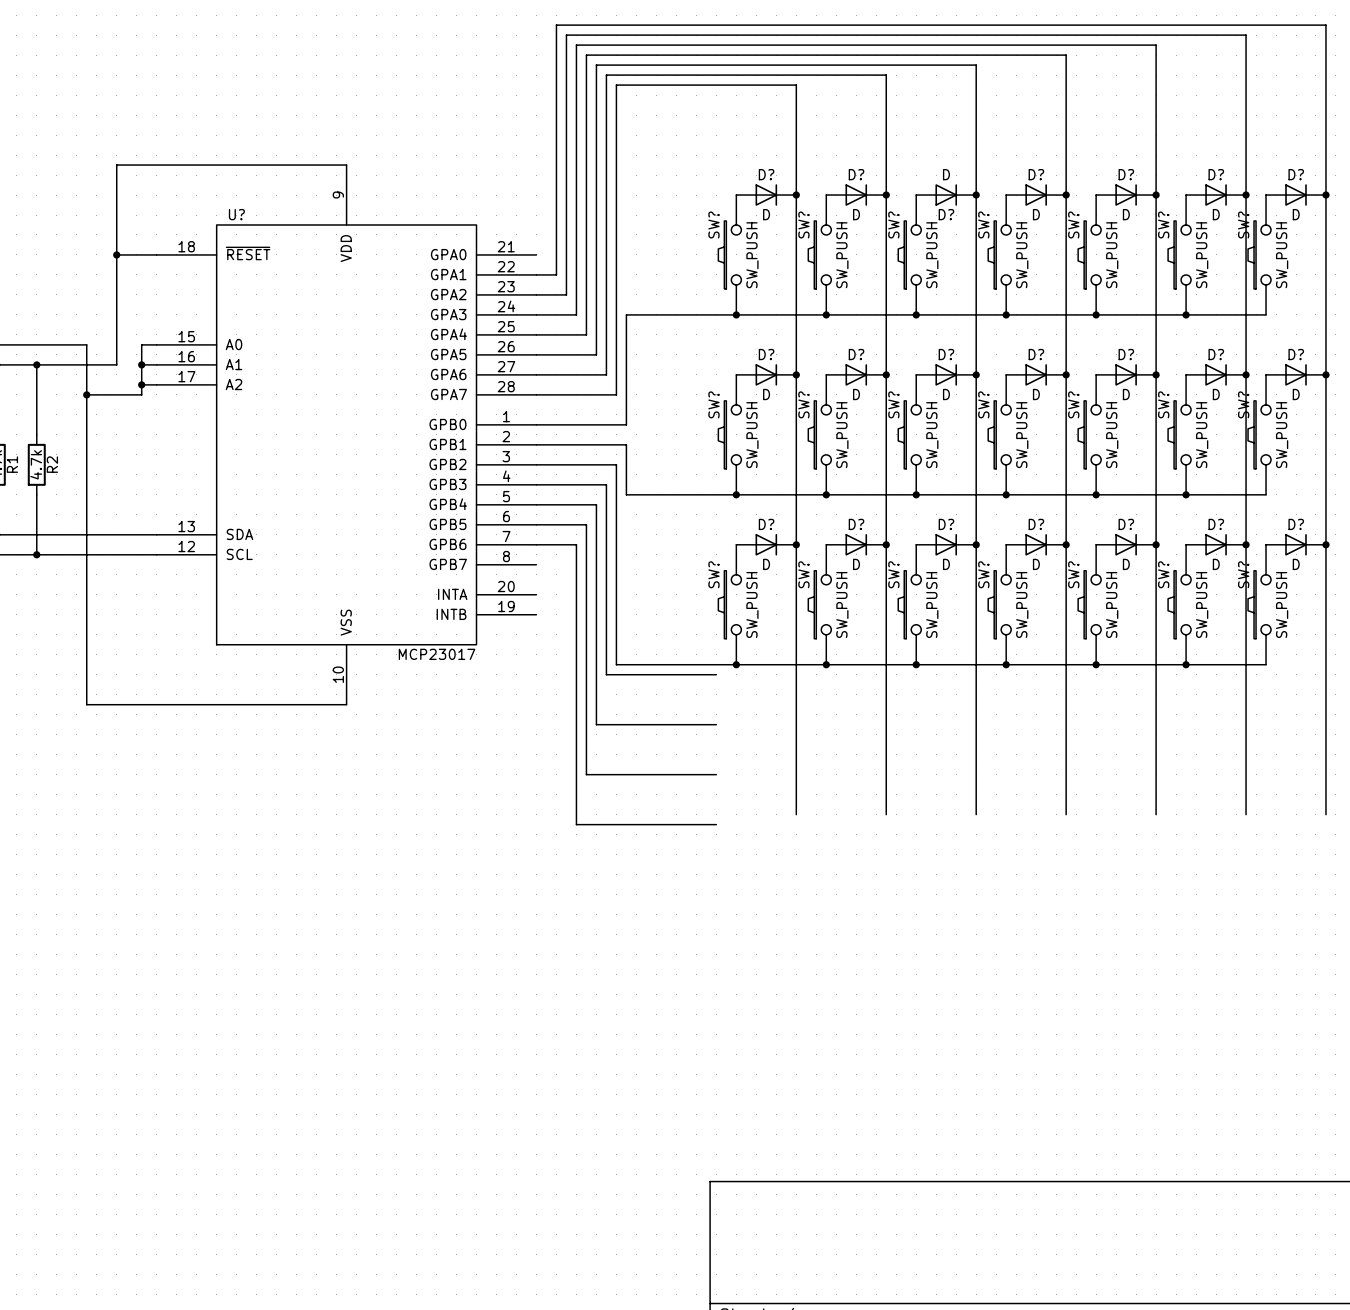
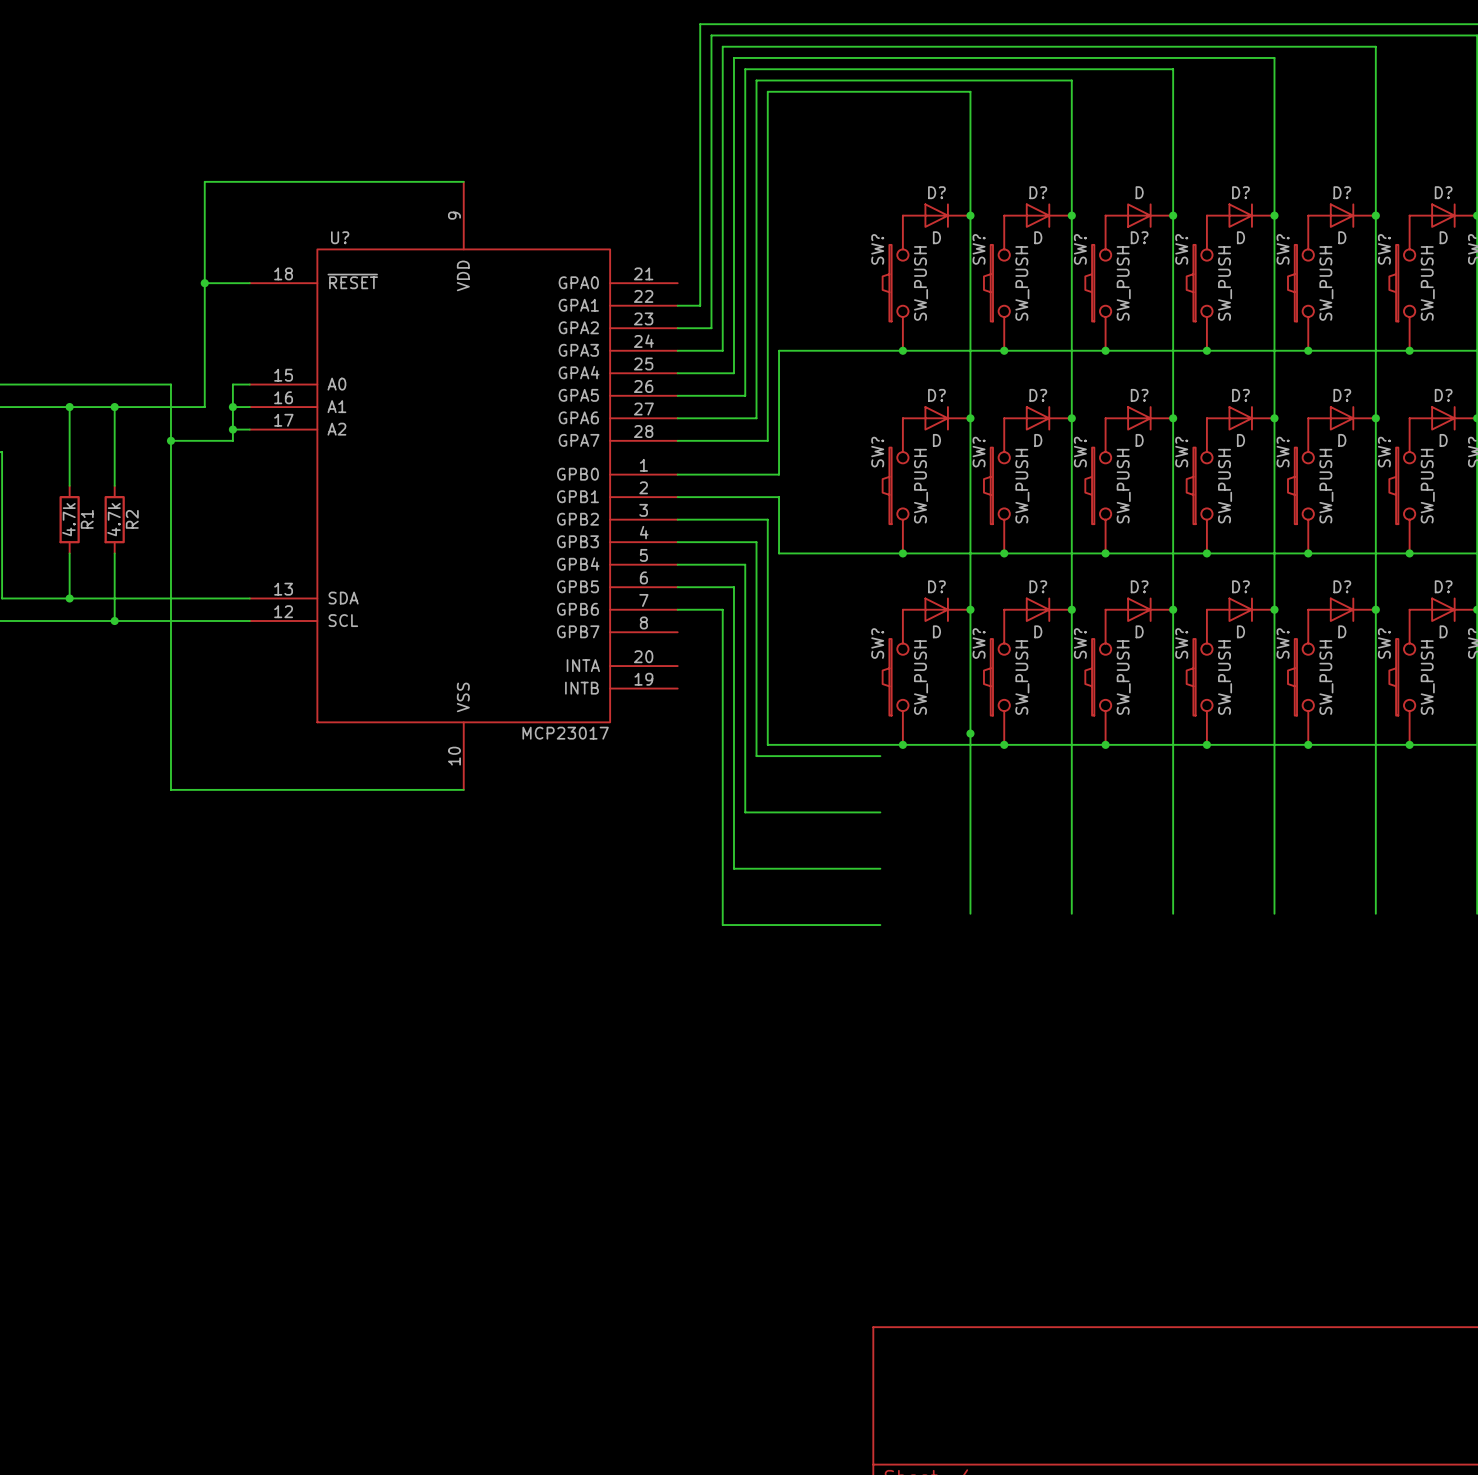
junction: none -> (970, 733)

